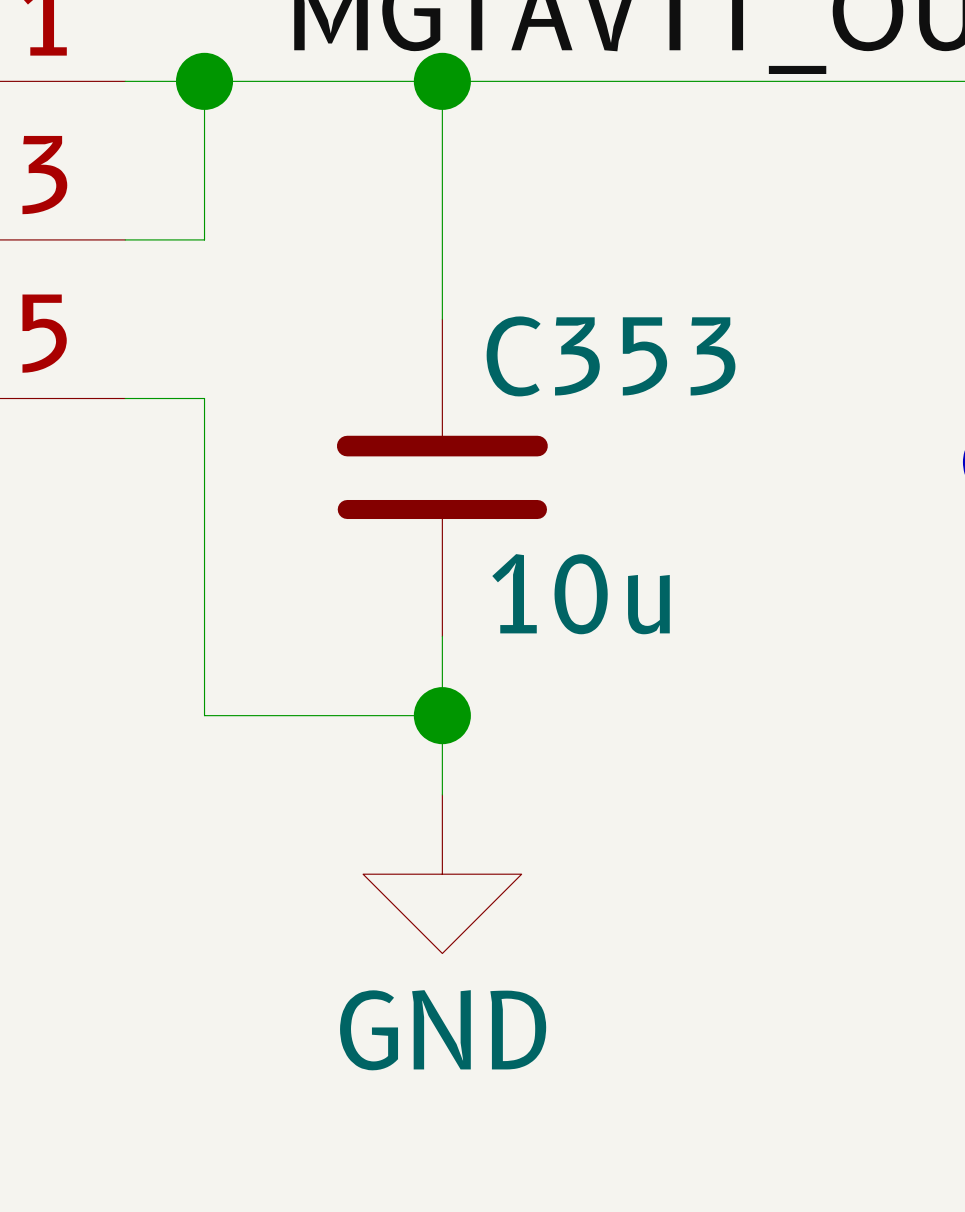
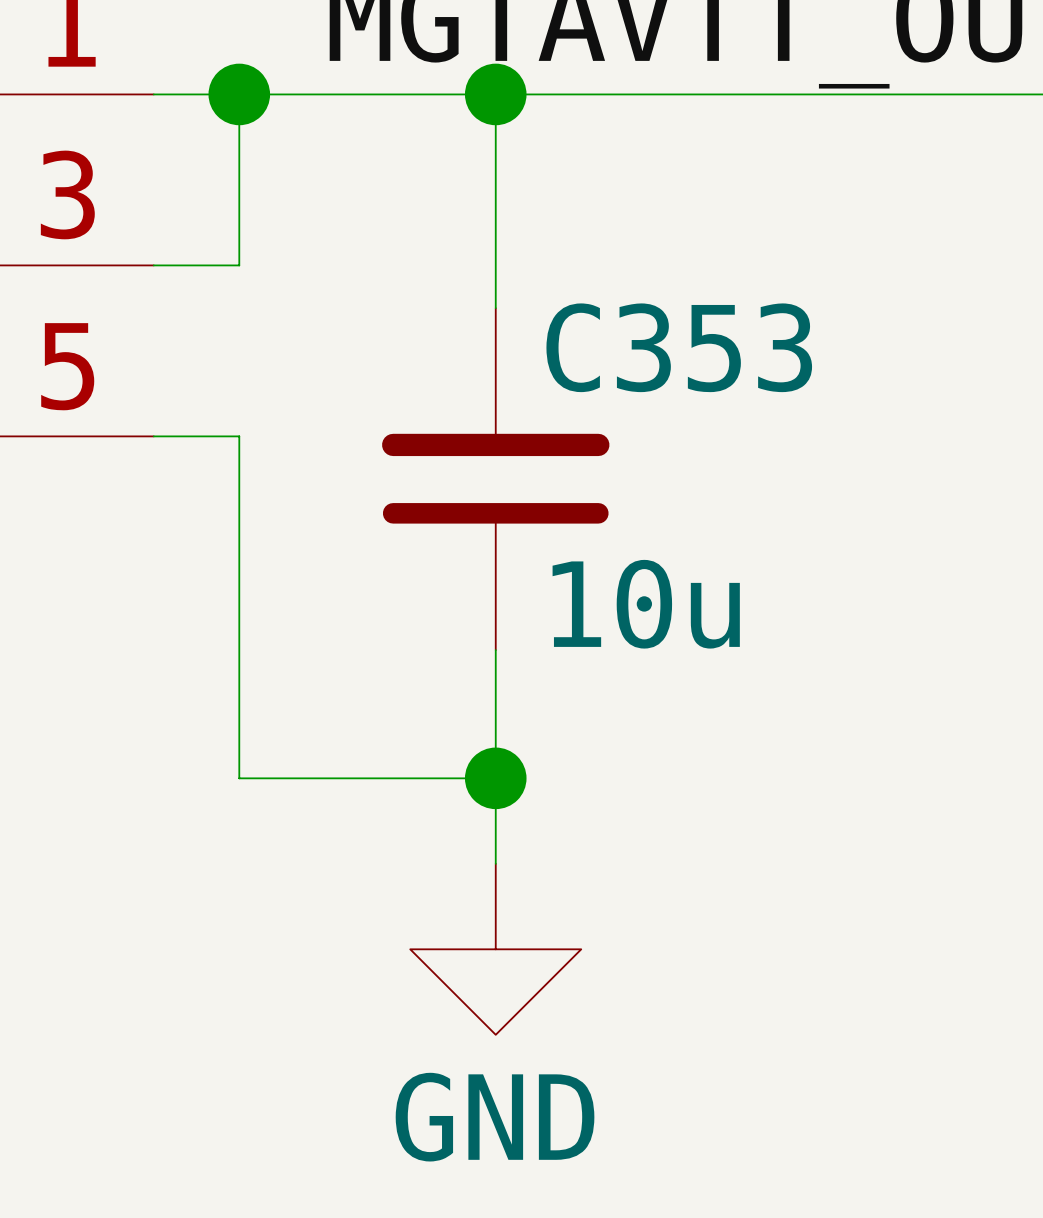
C353 position: (442, 477) -> (495, 479)

